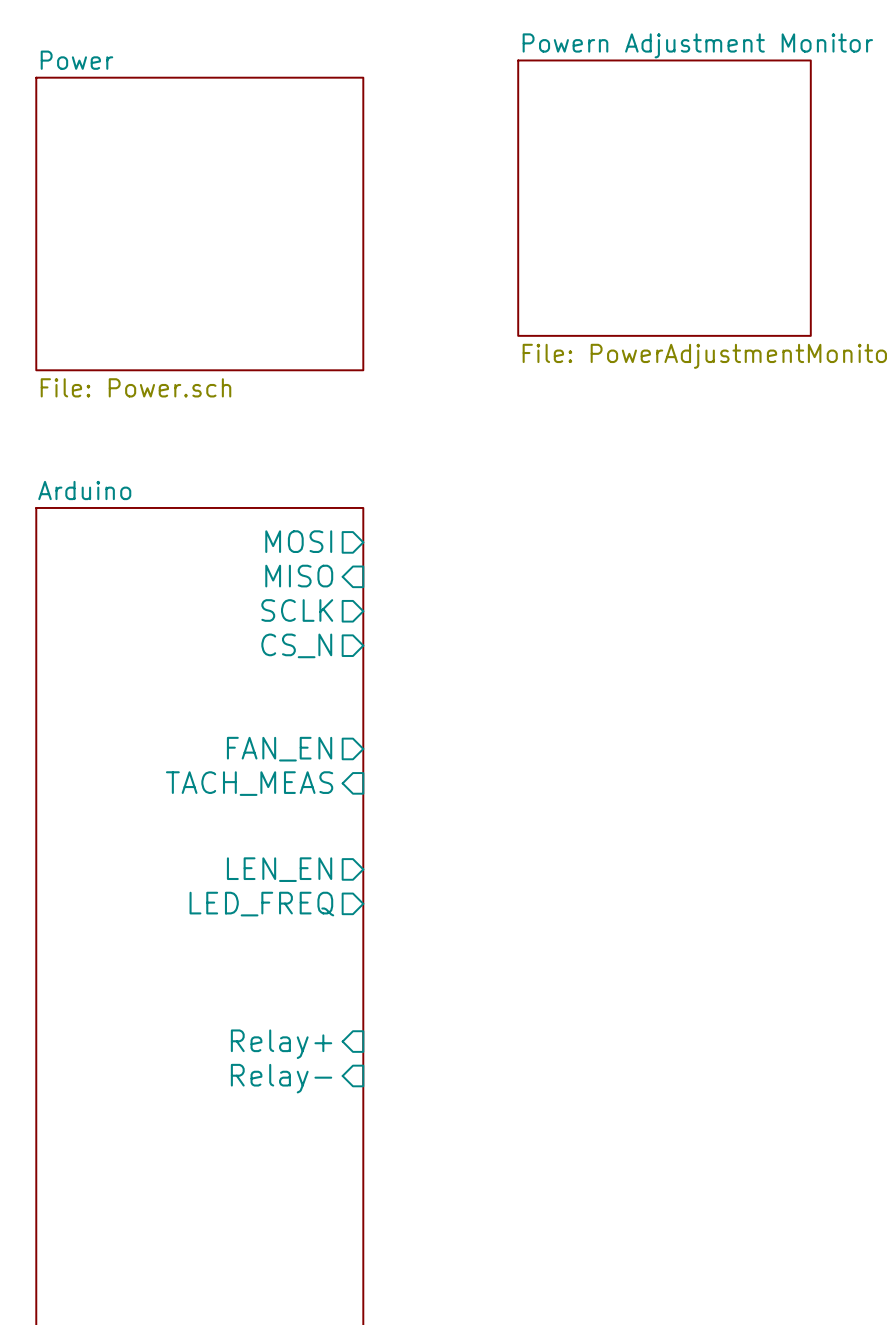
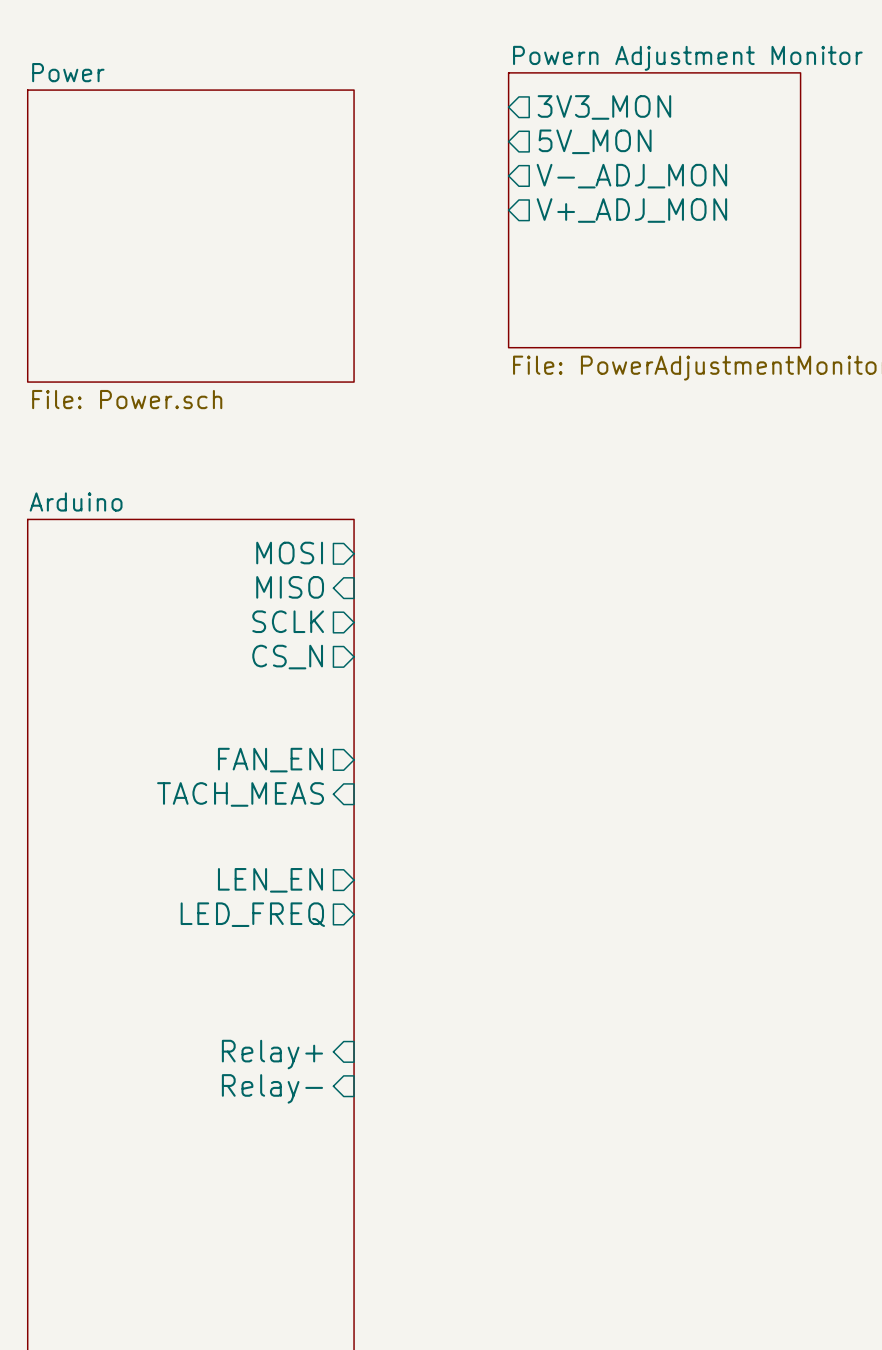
sheet pin: none -> 3V3_MON (604, 107)
sheet pin: none -> 5V_MON (595, 141)
sheet pin: none -> V-_ADJ_MON (631, 176)
sheet pin: none -> V+_ADJ_MON (631, 210)

